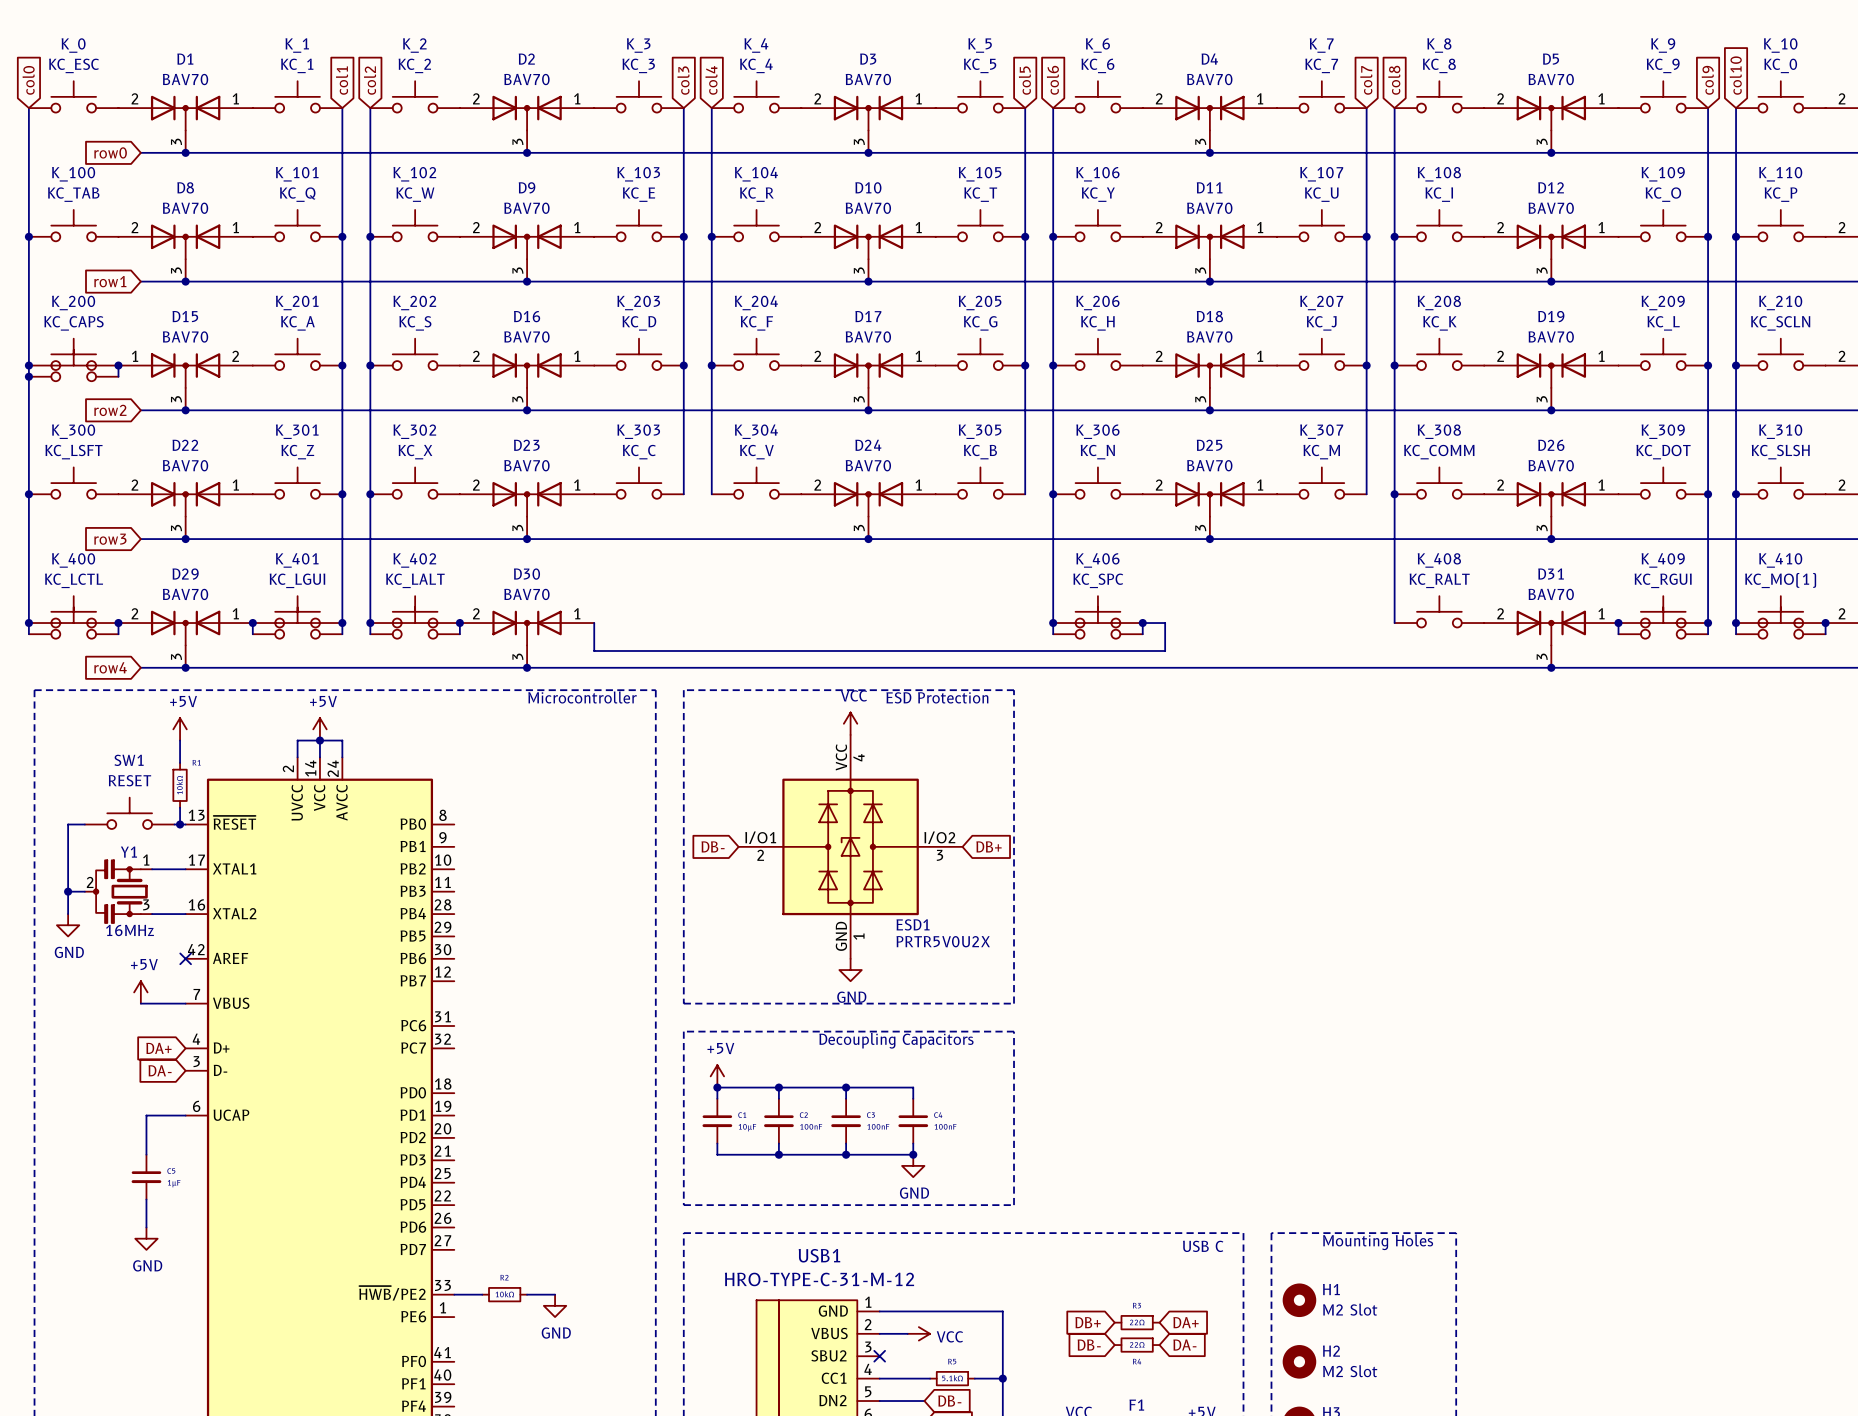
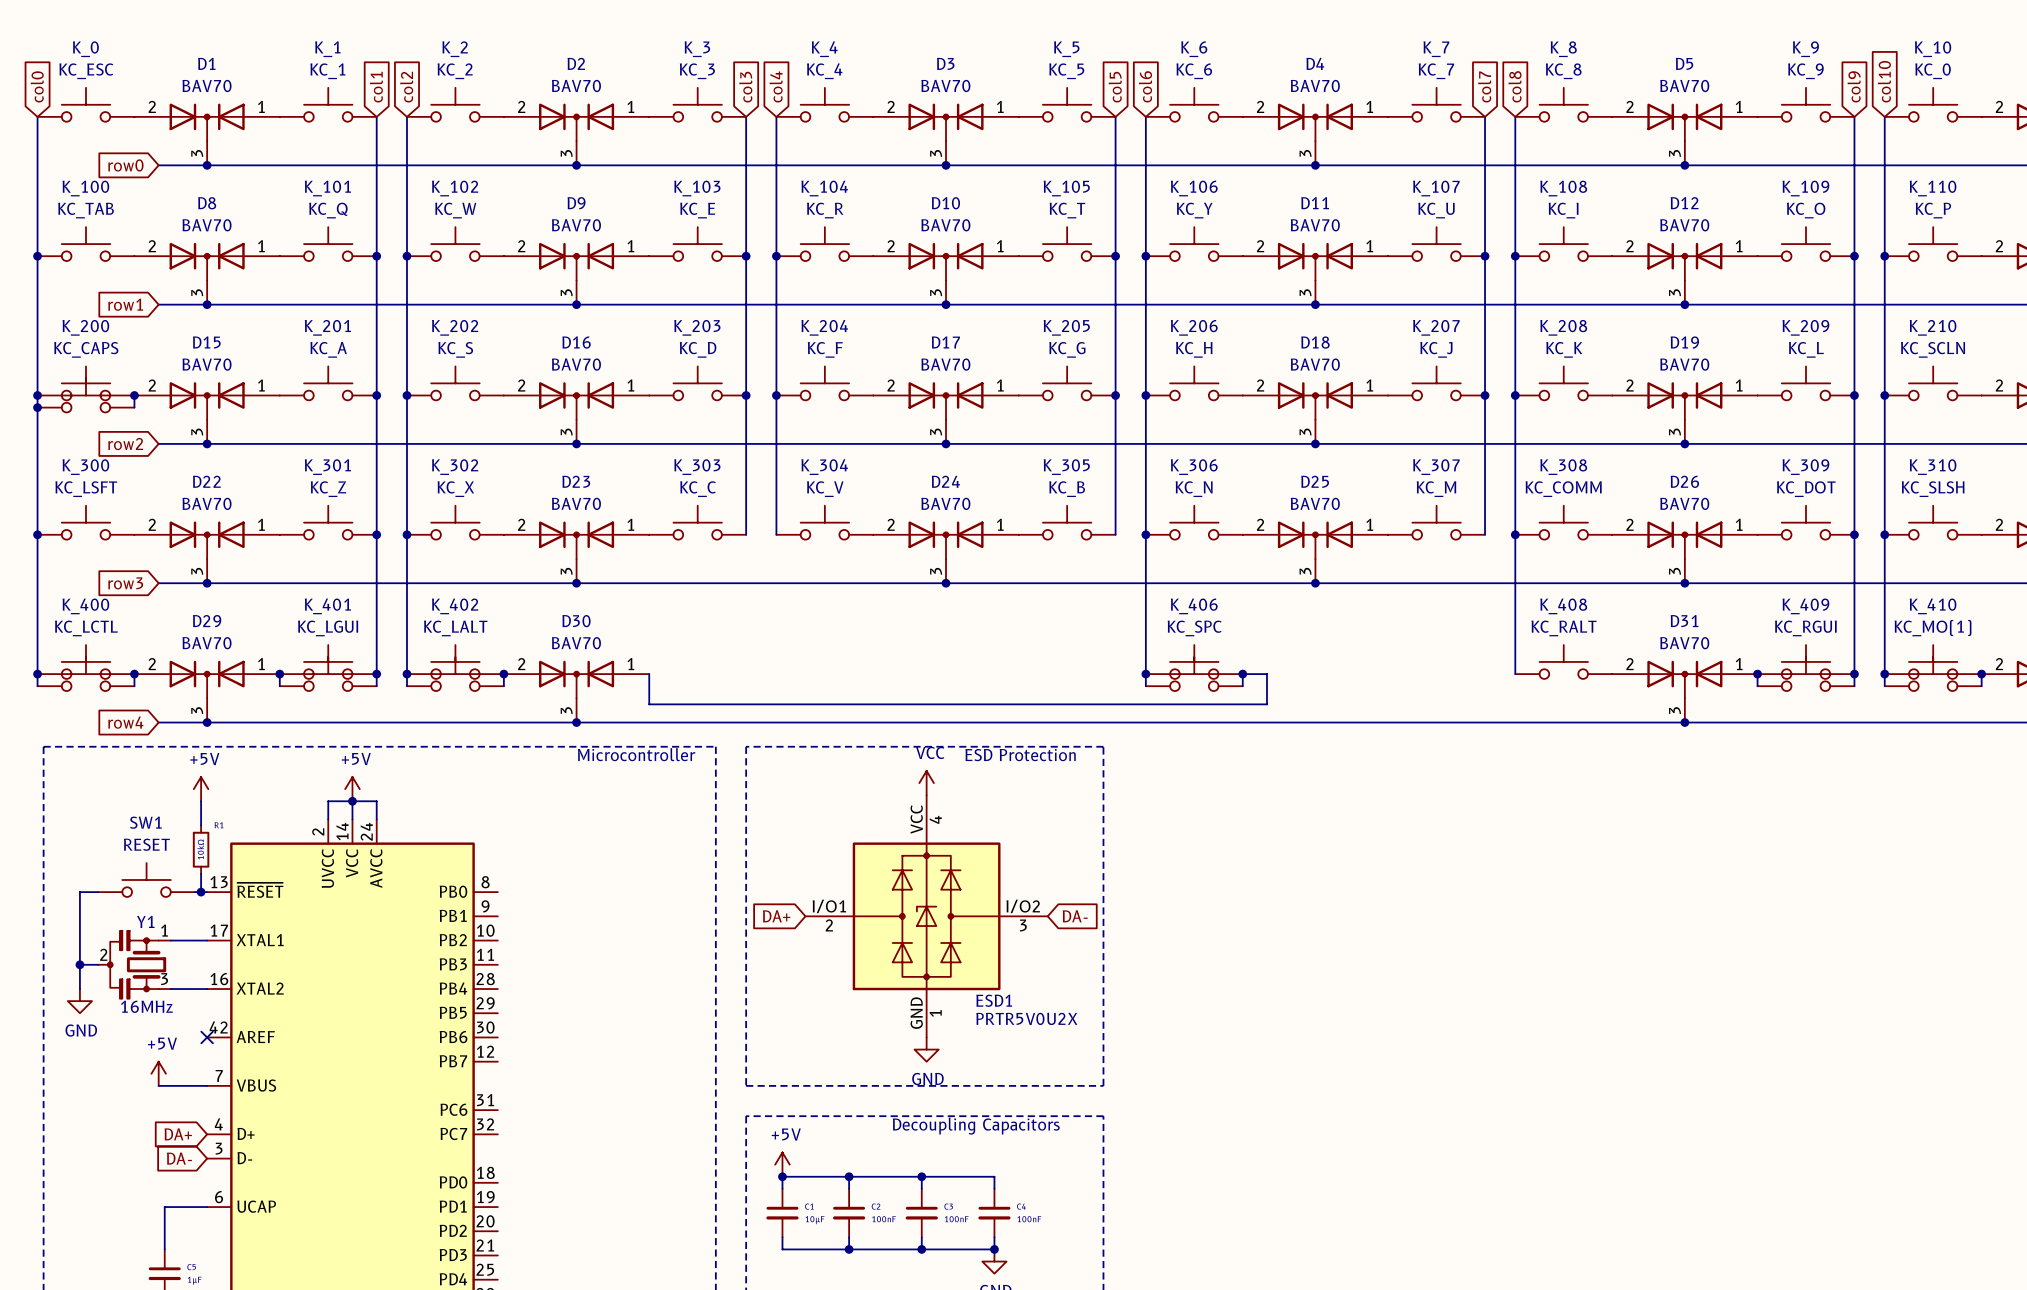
D15 flip: as is (185, 370) -> left-right (207, 400)
global label: DB- (713, 846) -> DA+ (776, 916)
global label: DB+ (988, 846) -> DA- (1075, 916)

